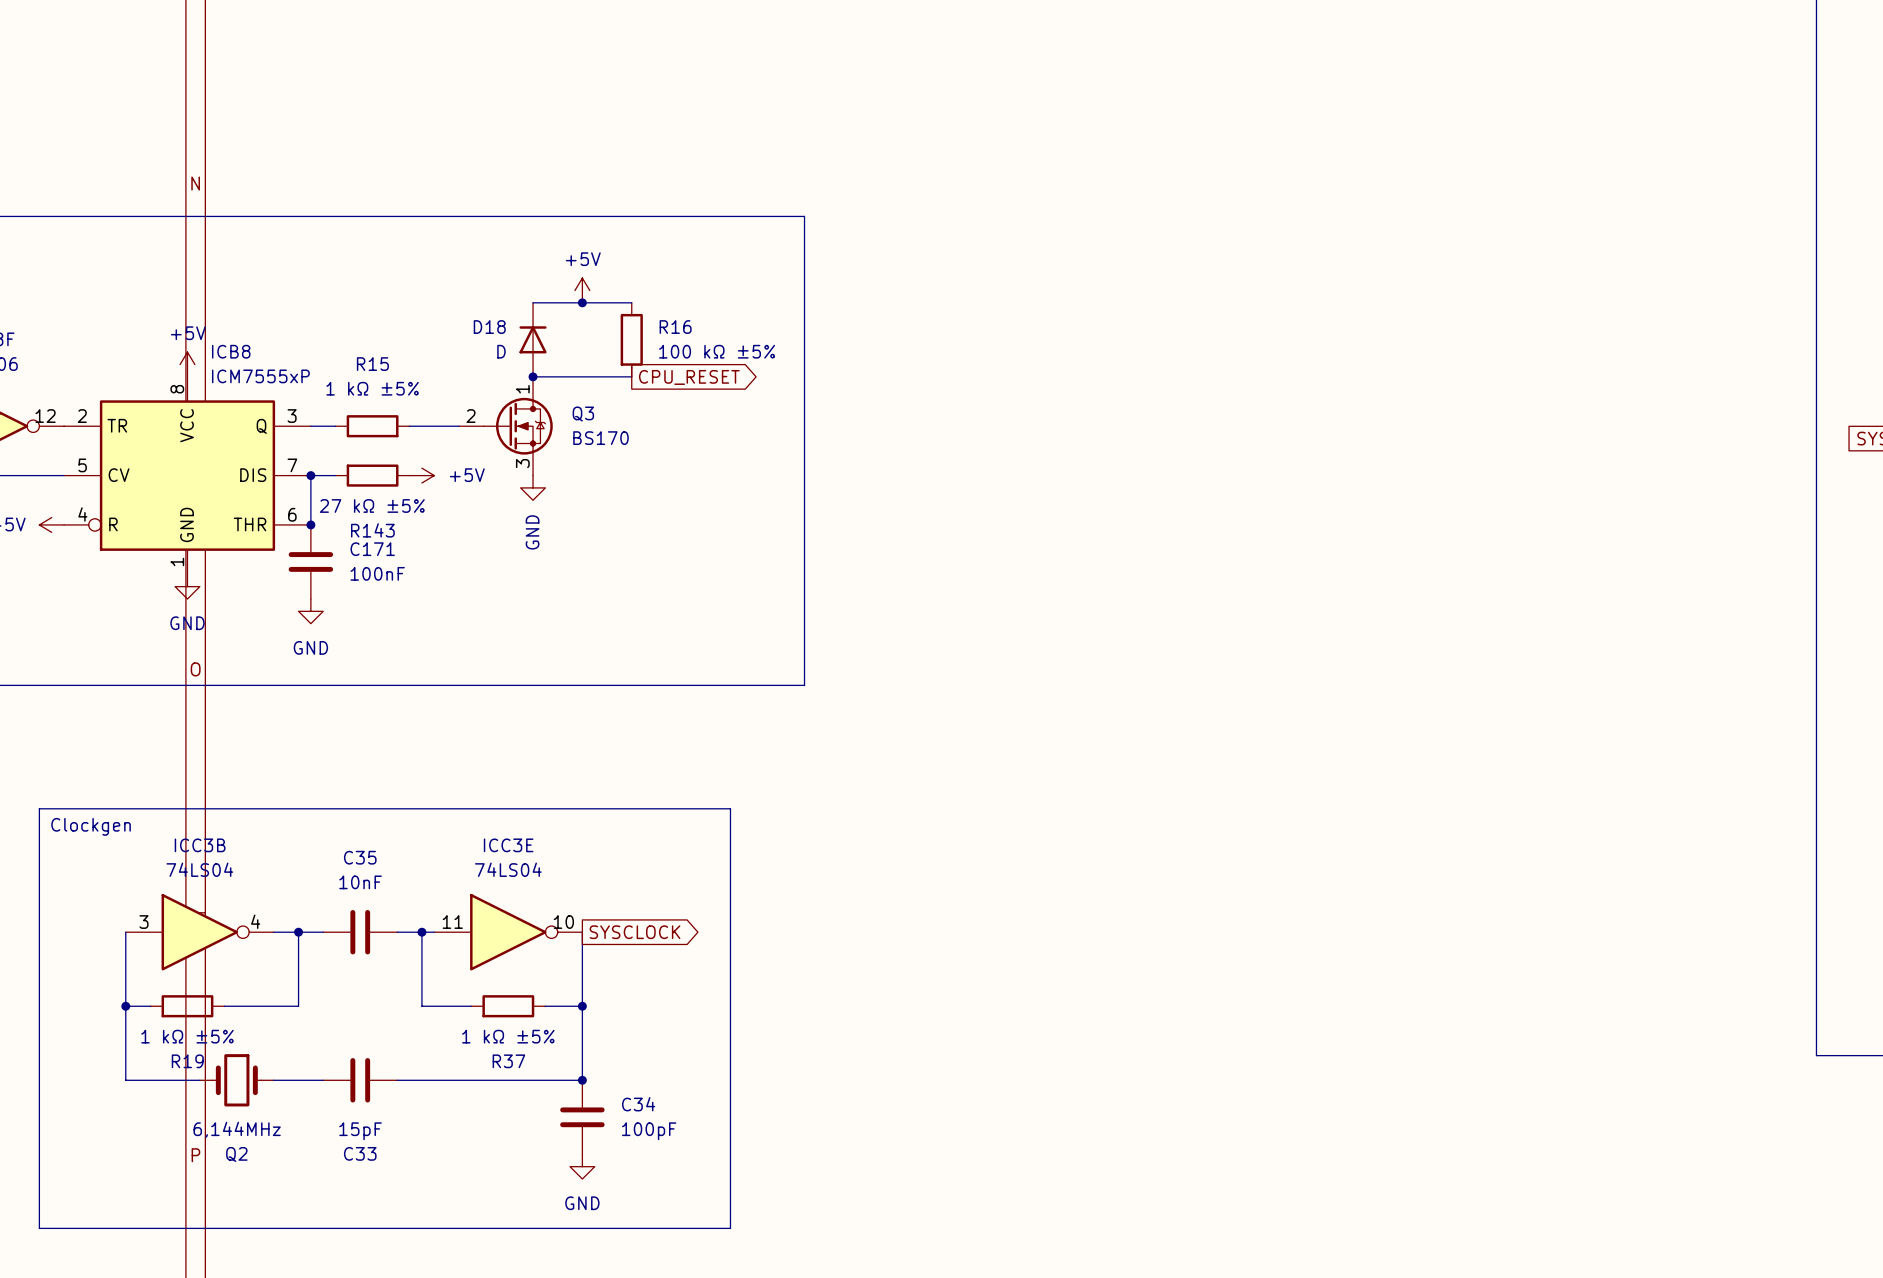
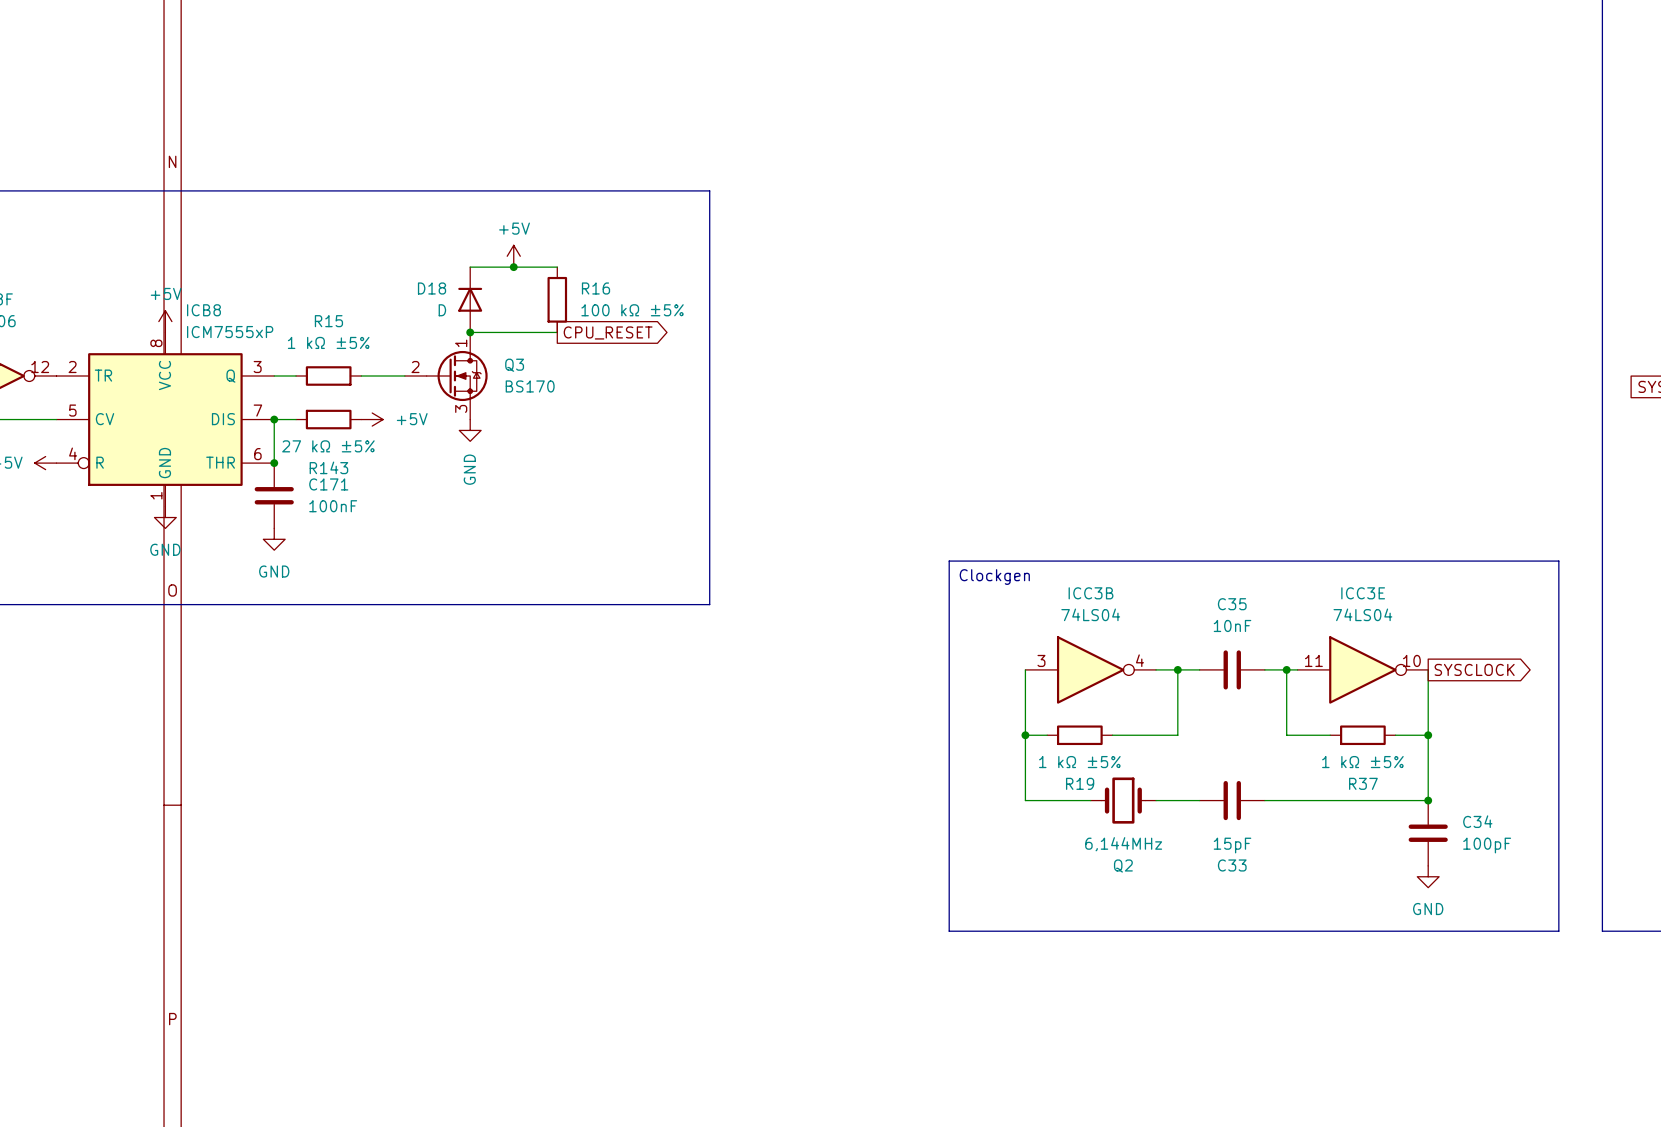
line: none -> (949, 561) (1558, 561) (1558, 931) (949, 931) (949, 561)
text: none -> Clockgen (994, 577)
wire: none -> (1025, 669) (1025, 800) (1090, 800)
wire: none -> (1156, 669) (1199, 669)
wire: none -> (1177, 669) (1177, 735) (1112, 735)
junction: none -> (1177, 669)
wire: none -> (1264, 669) (1297, 669)
wire: none -> (1286, 669) (1286, 735) (1330, 735)
junction: none -> (1286, 669)
wire: none -> (1428, 669) (1428, 800) (1264, 800)
global label: none -> SYSCLOCK (1474, 669)
line: (39, 808) (730, 808) (730, 1228) (39, 1228) (39, 808) -> none
text: Clockgen (91, 826) -> none
wire: none -> (1025, 735) (1047, 735)
junction: none -> (1025, 735)
wire: none -> (1395, 735) (1428, 735)
junction: none -> (1428, 735)
wire: none -> (1156, 800) (1199, 800)
junction: none -> (1428, 800)
wire: (125, 932) (125, 1080) (199, 1080) -> none
ICC3B position: (199, 932) -> (1090, 669)
wire: (273, 932) (323, 932) -> none
wire: (298, 932) (298, 1006) (224, 1006) -> none
junction: (298, 932) -> none
C35 position: (360, 932) -> (1232, 669)
wire: (397, 932) (434, 932) -> none
wire: (421, 932) (421, 1006) (471, 1006) -> none
junction: (421, 932) -> none
ICC3E position: (508, 932) -> (1362, 669)
wire: (582, 932) (582, 1080) (397, 1080) -> none
global label: SYSCLOCK (635, 932) -> none
power symbol: none -> GND (1428, 876)
wire: (125, 1006) (150, 1006) -> none
junction: (125, 1006) -> none
R19 position: (187, 1006) -> (1079, 735)
R37 position: (508, 1006) -> (1362, 735)
wire: (545, 1006) (582, 1006) -> none
junction: (582, 1006) -> none
Q2 position: (236, 1080) -> (1123, 800)
wire: (273, 1080) (323, 1080) -> none
C33 position: (360, 1080) -> (1232, 800)
junction: (582, 1080) -> none
C34 position: (582, 1117) -> (1428, 833)
power symbol: GND (582, 1166) -> none

